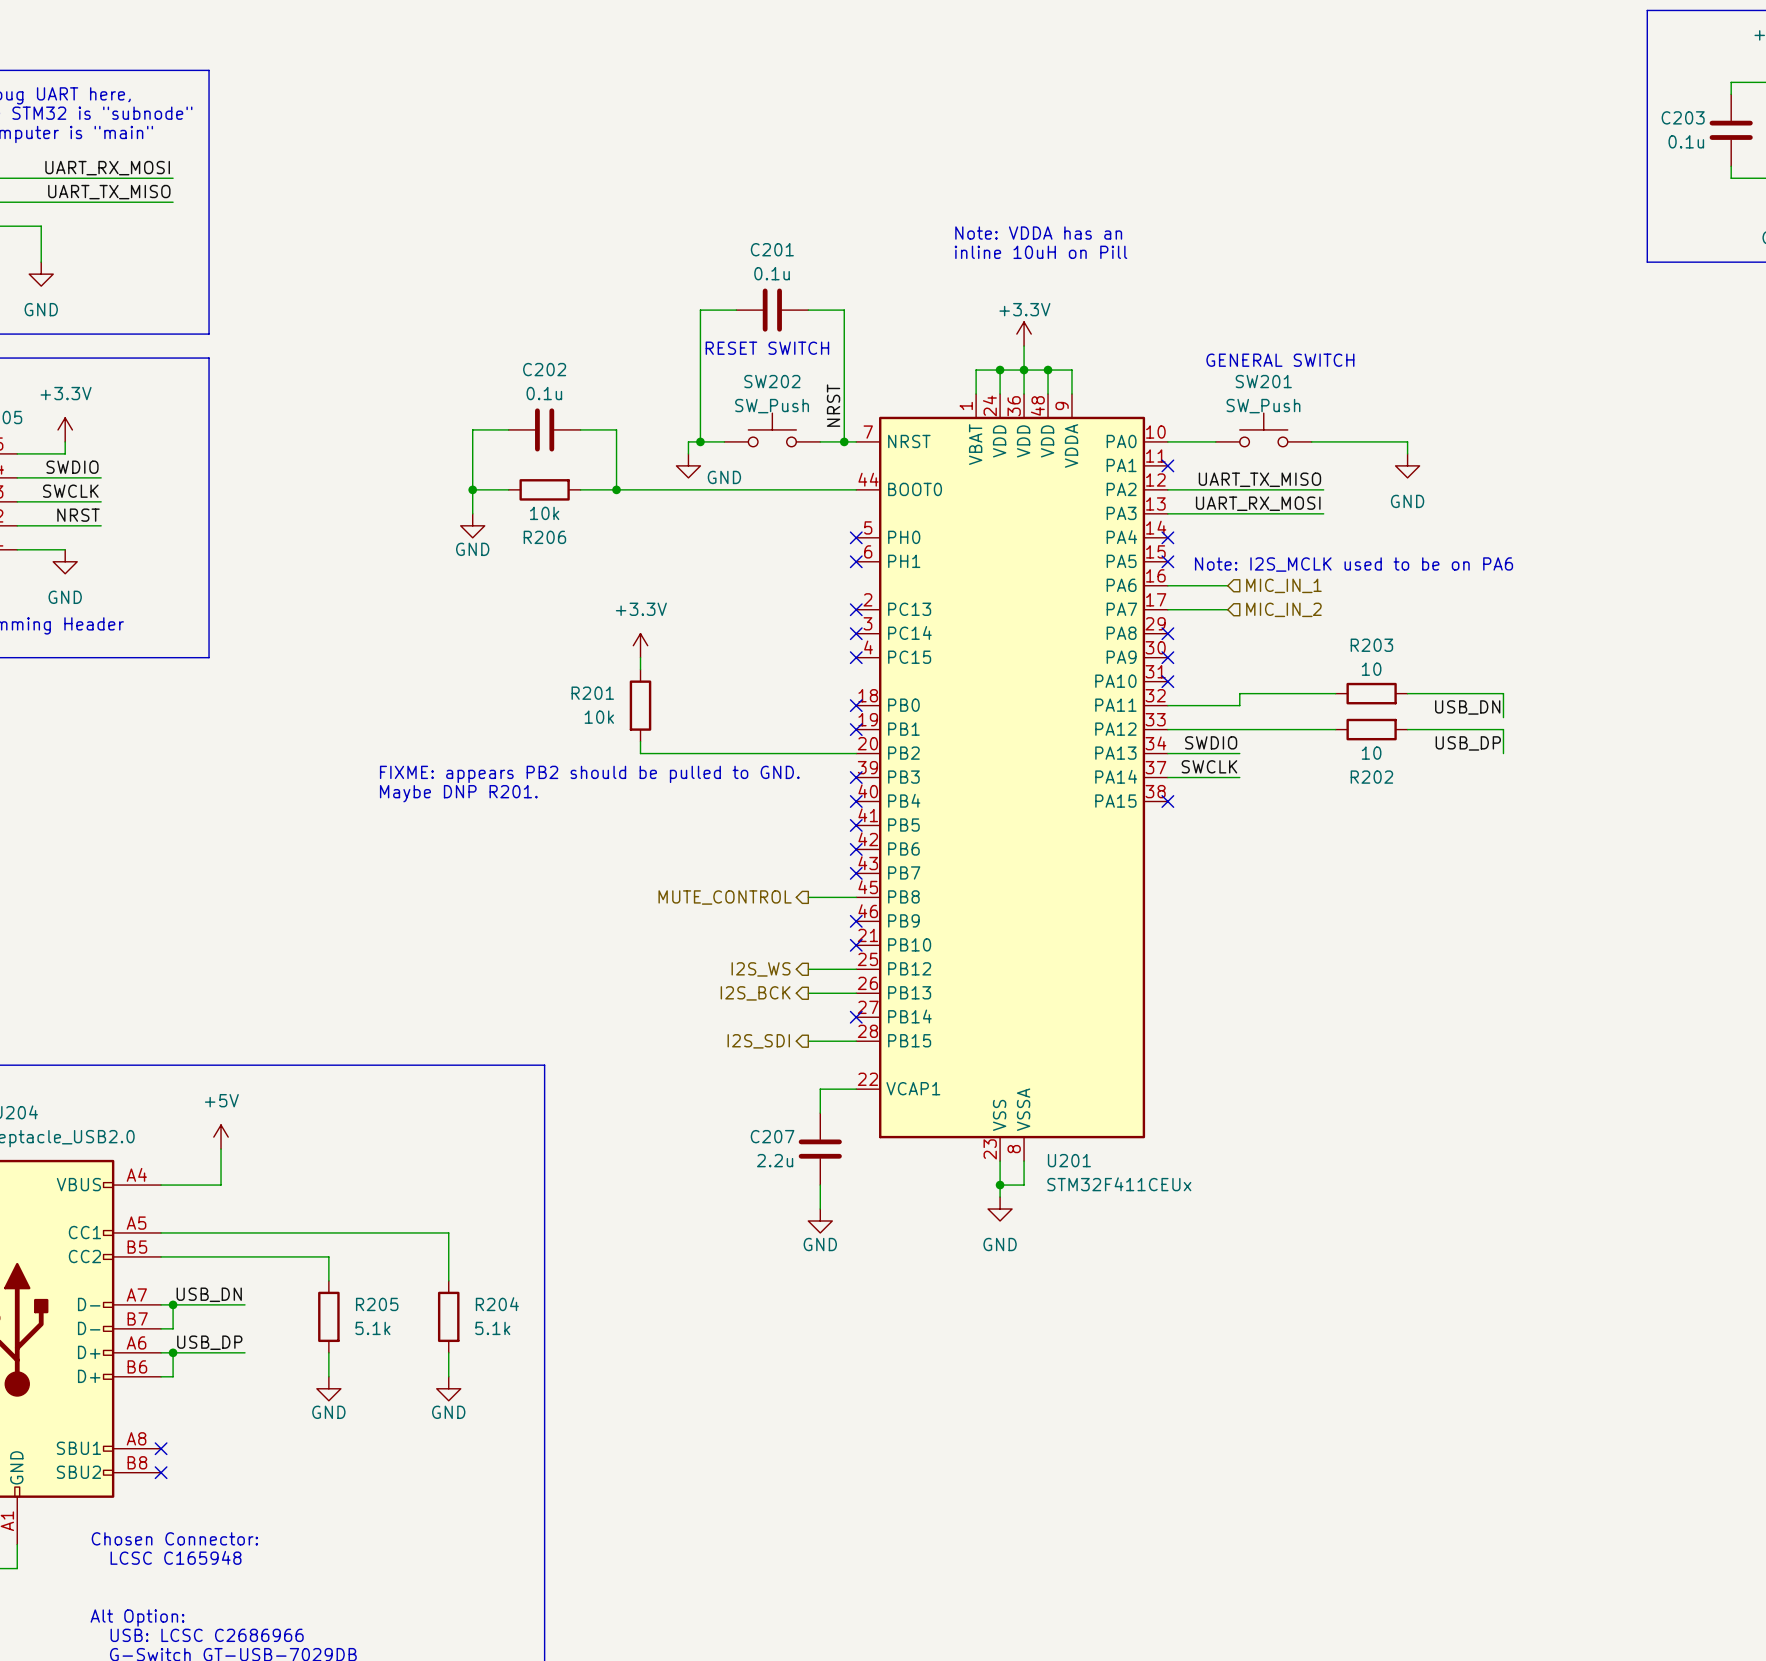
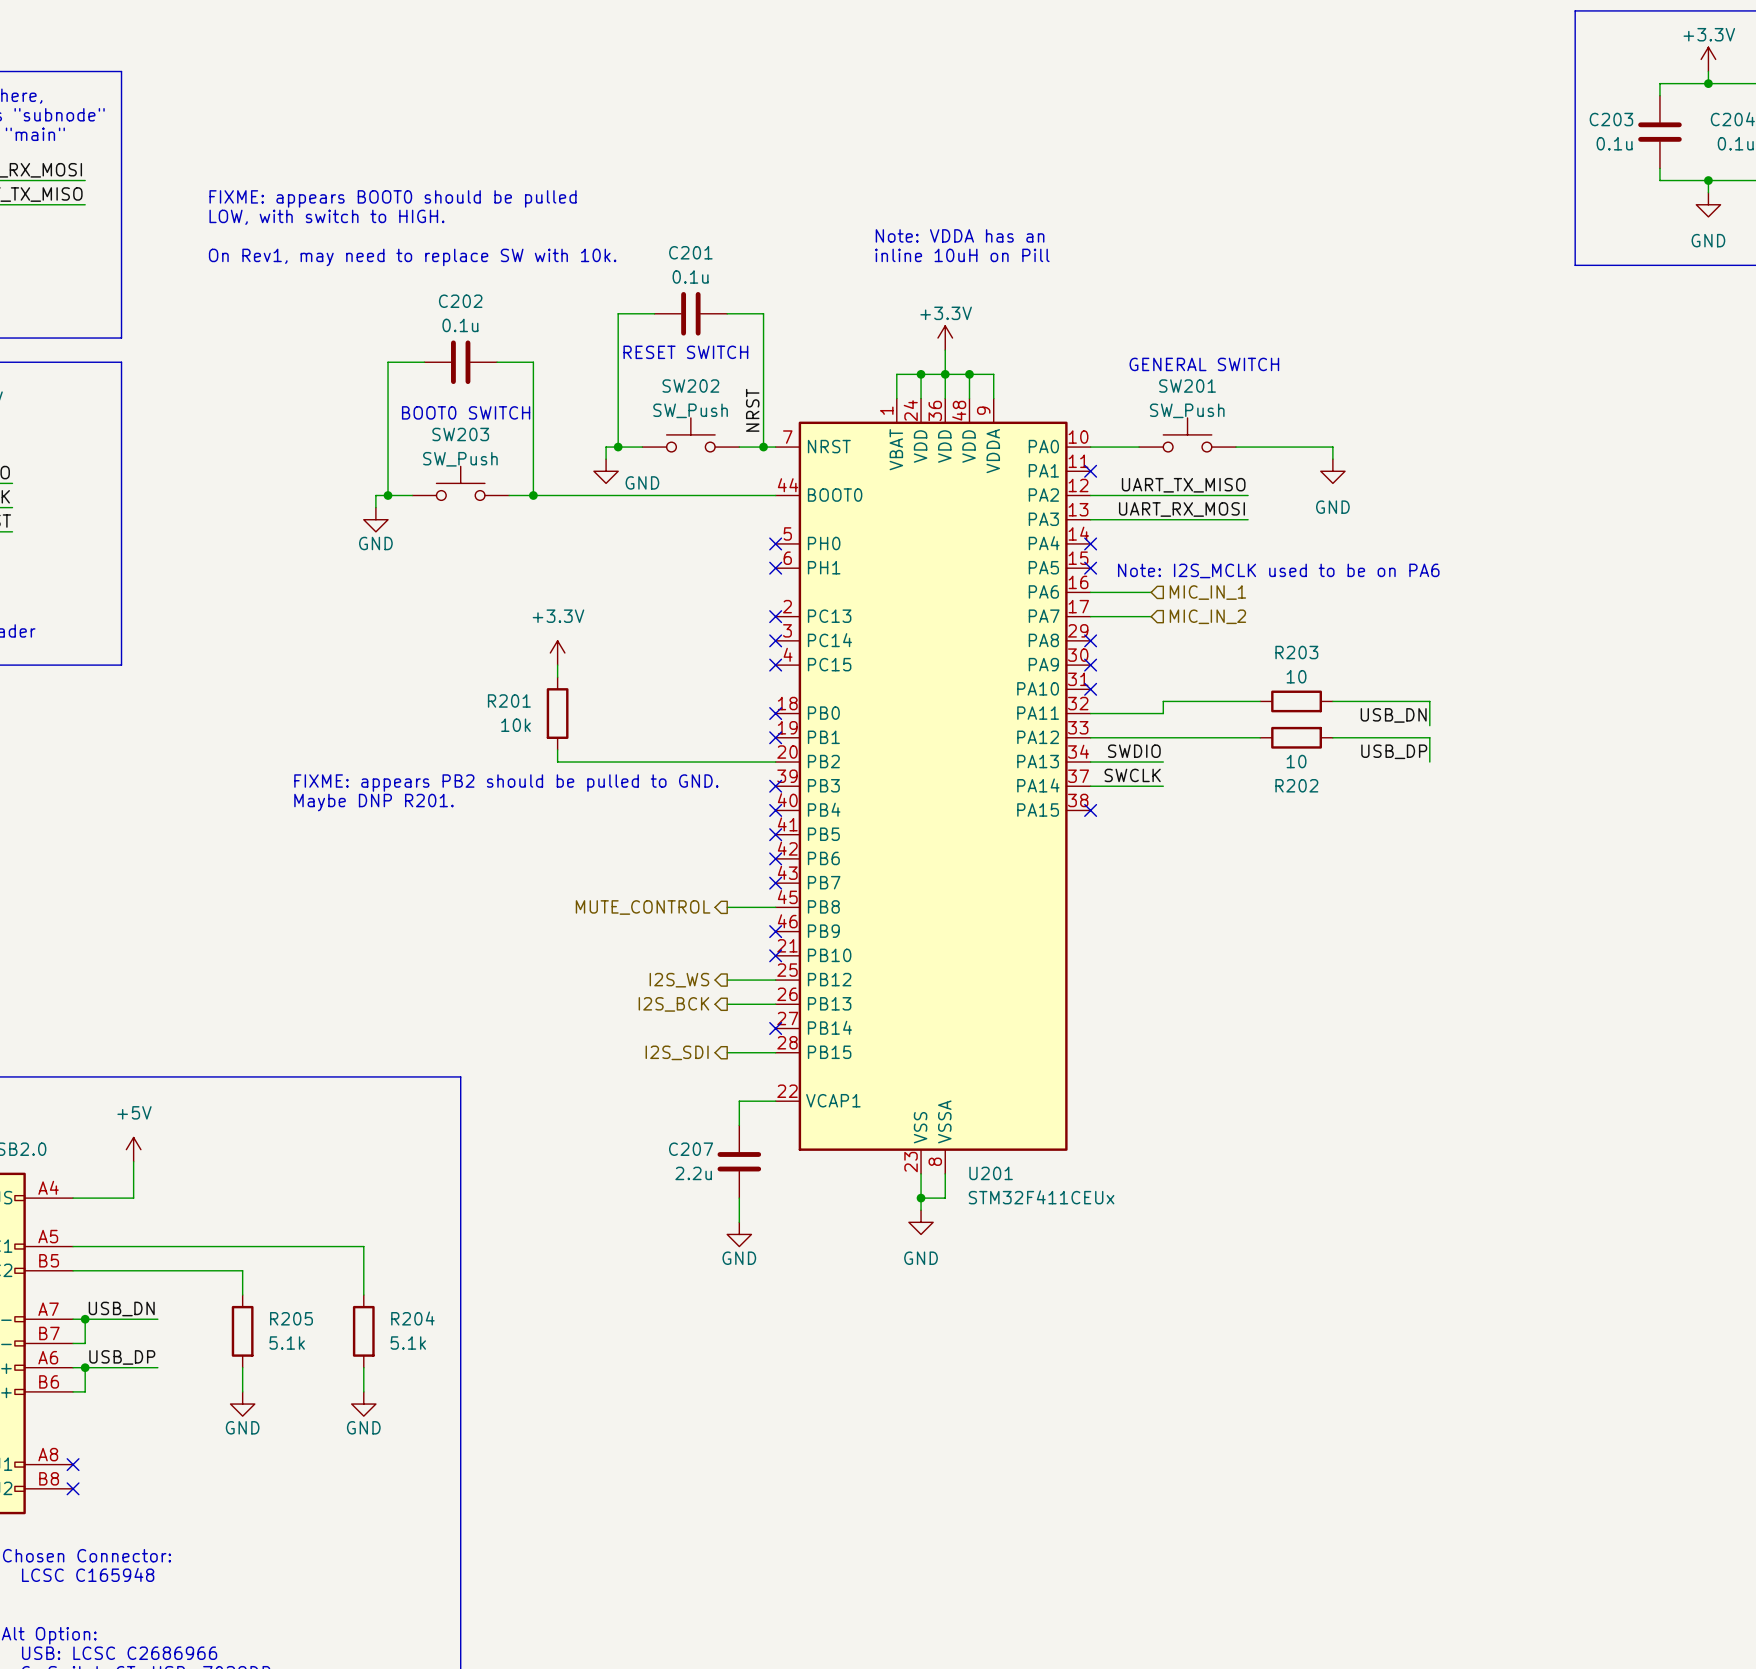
text: none -> FIXME: appears BOOT0 should be pulled (393, 198)
text: none -> LOW, with switch to HIGH. (326, 217)
text: none -> On Rev1, may need to replace SW with 10k. (412, 257)
text: none -> BOOT0 SWITCH (466, 412)
wire: (472, 429) (508, 429) -> (388, 434) (388, 362) (424, 362)
C202 position: (544, 429) -> (460, 362)
wire: (580, 429) (616, 429) -> (497, 362) (533, 362) (533, 434)
SW203: none -> SW_Push (460, 483)
wire: (472, 489) (472, 513) -> (388, 495) (375, 495) (375, 507)
R206: 10k (544, 489) -> none
power symbol position: GND (472, 525) -> GND (375, 519)

